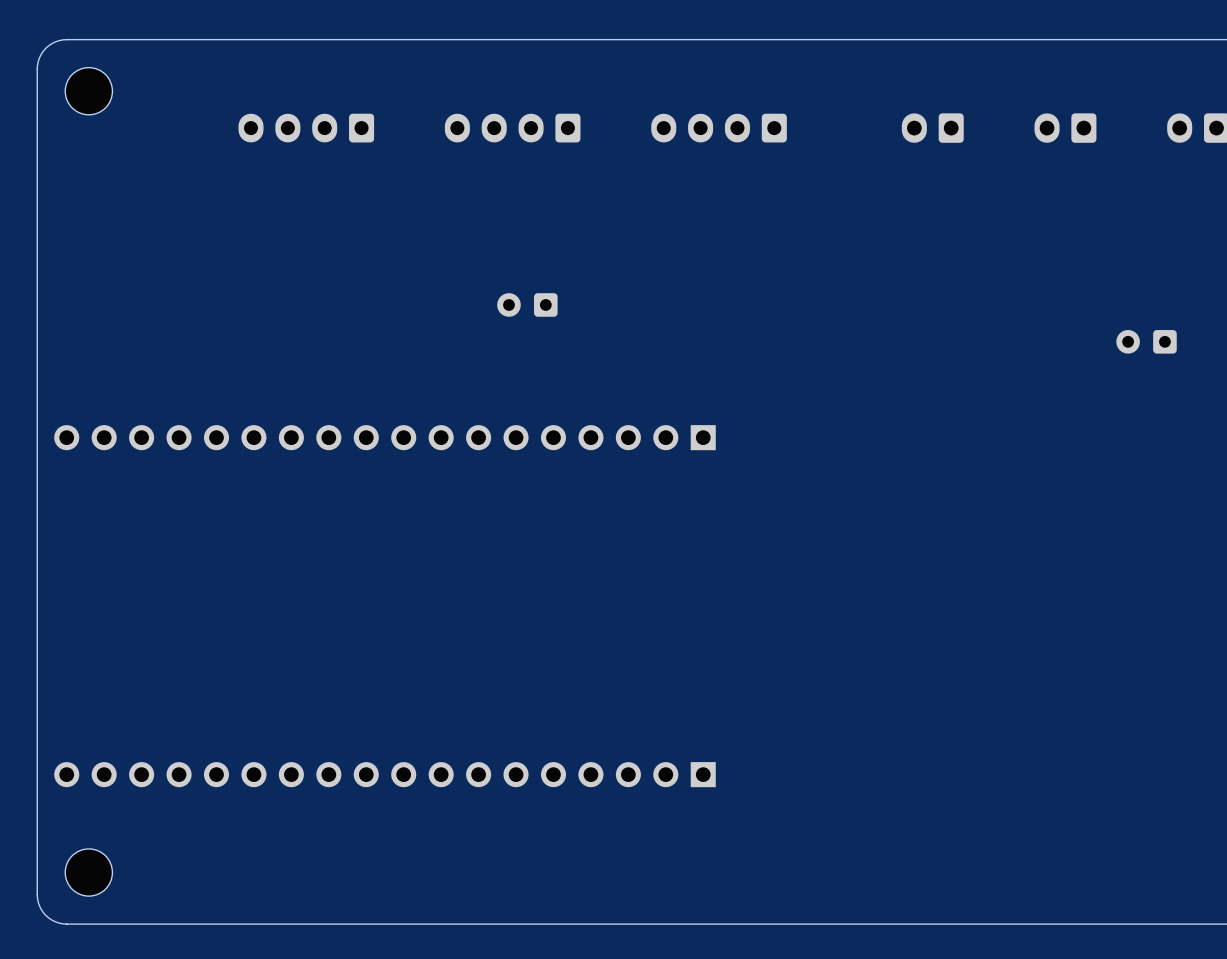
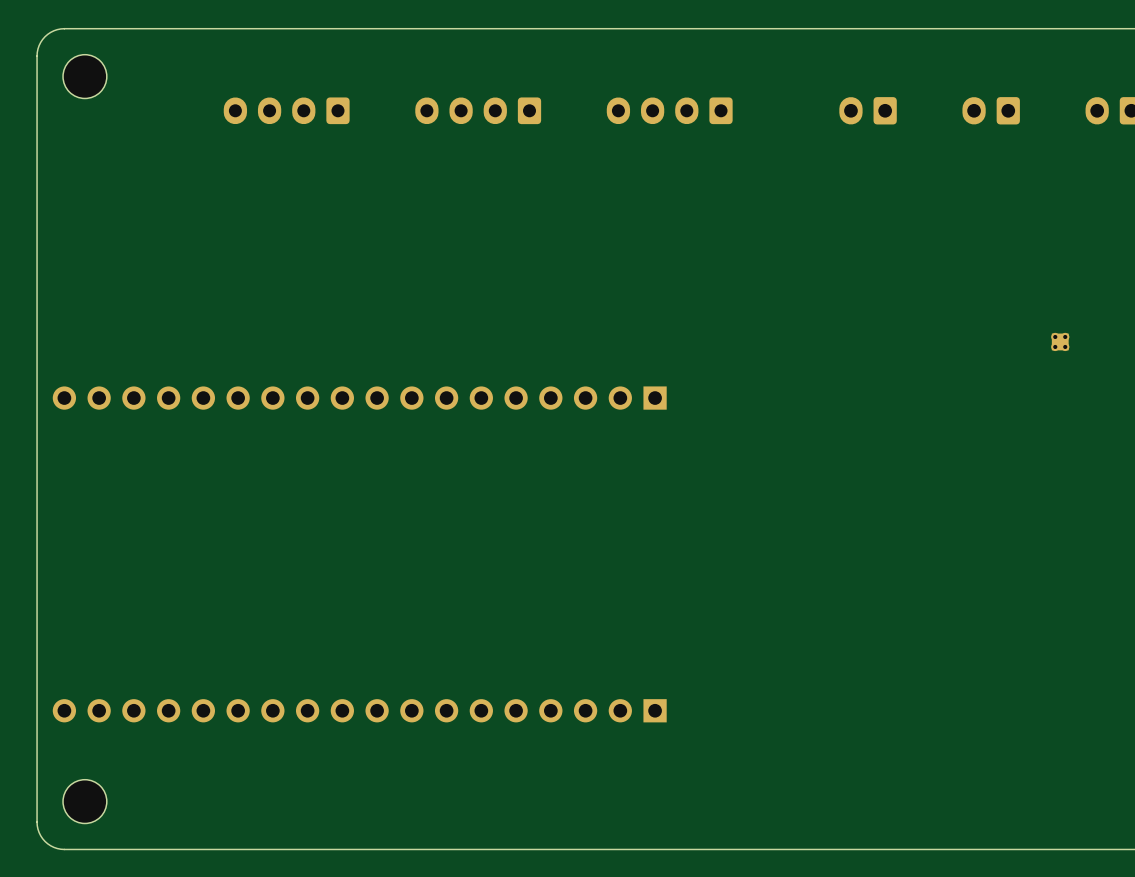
part: (527, 304) -> none
part: (1146, 341) -> none
part: none -> (1060, 341)

